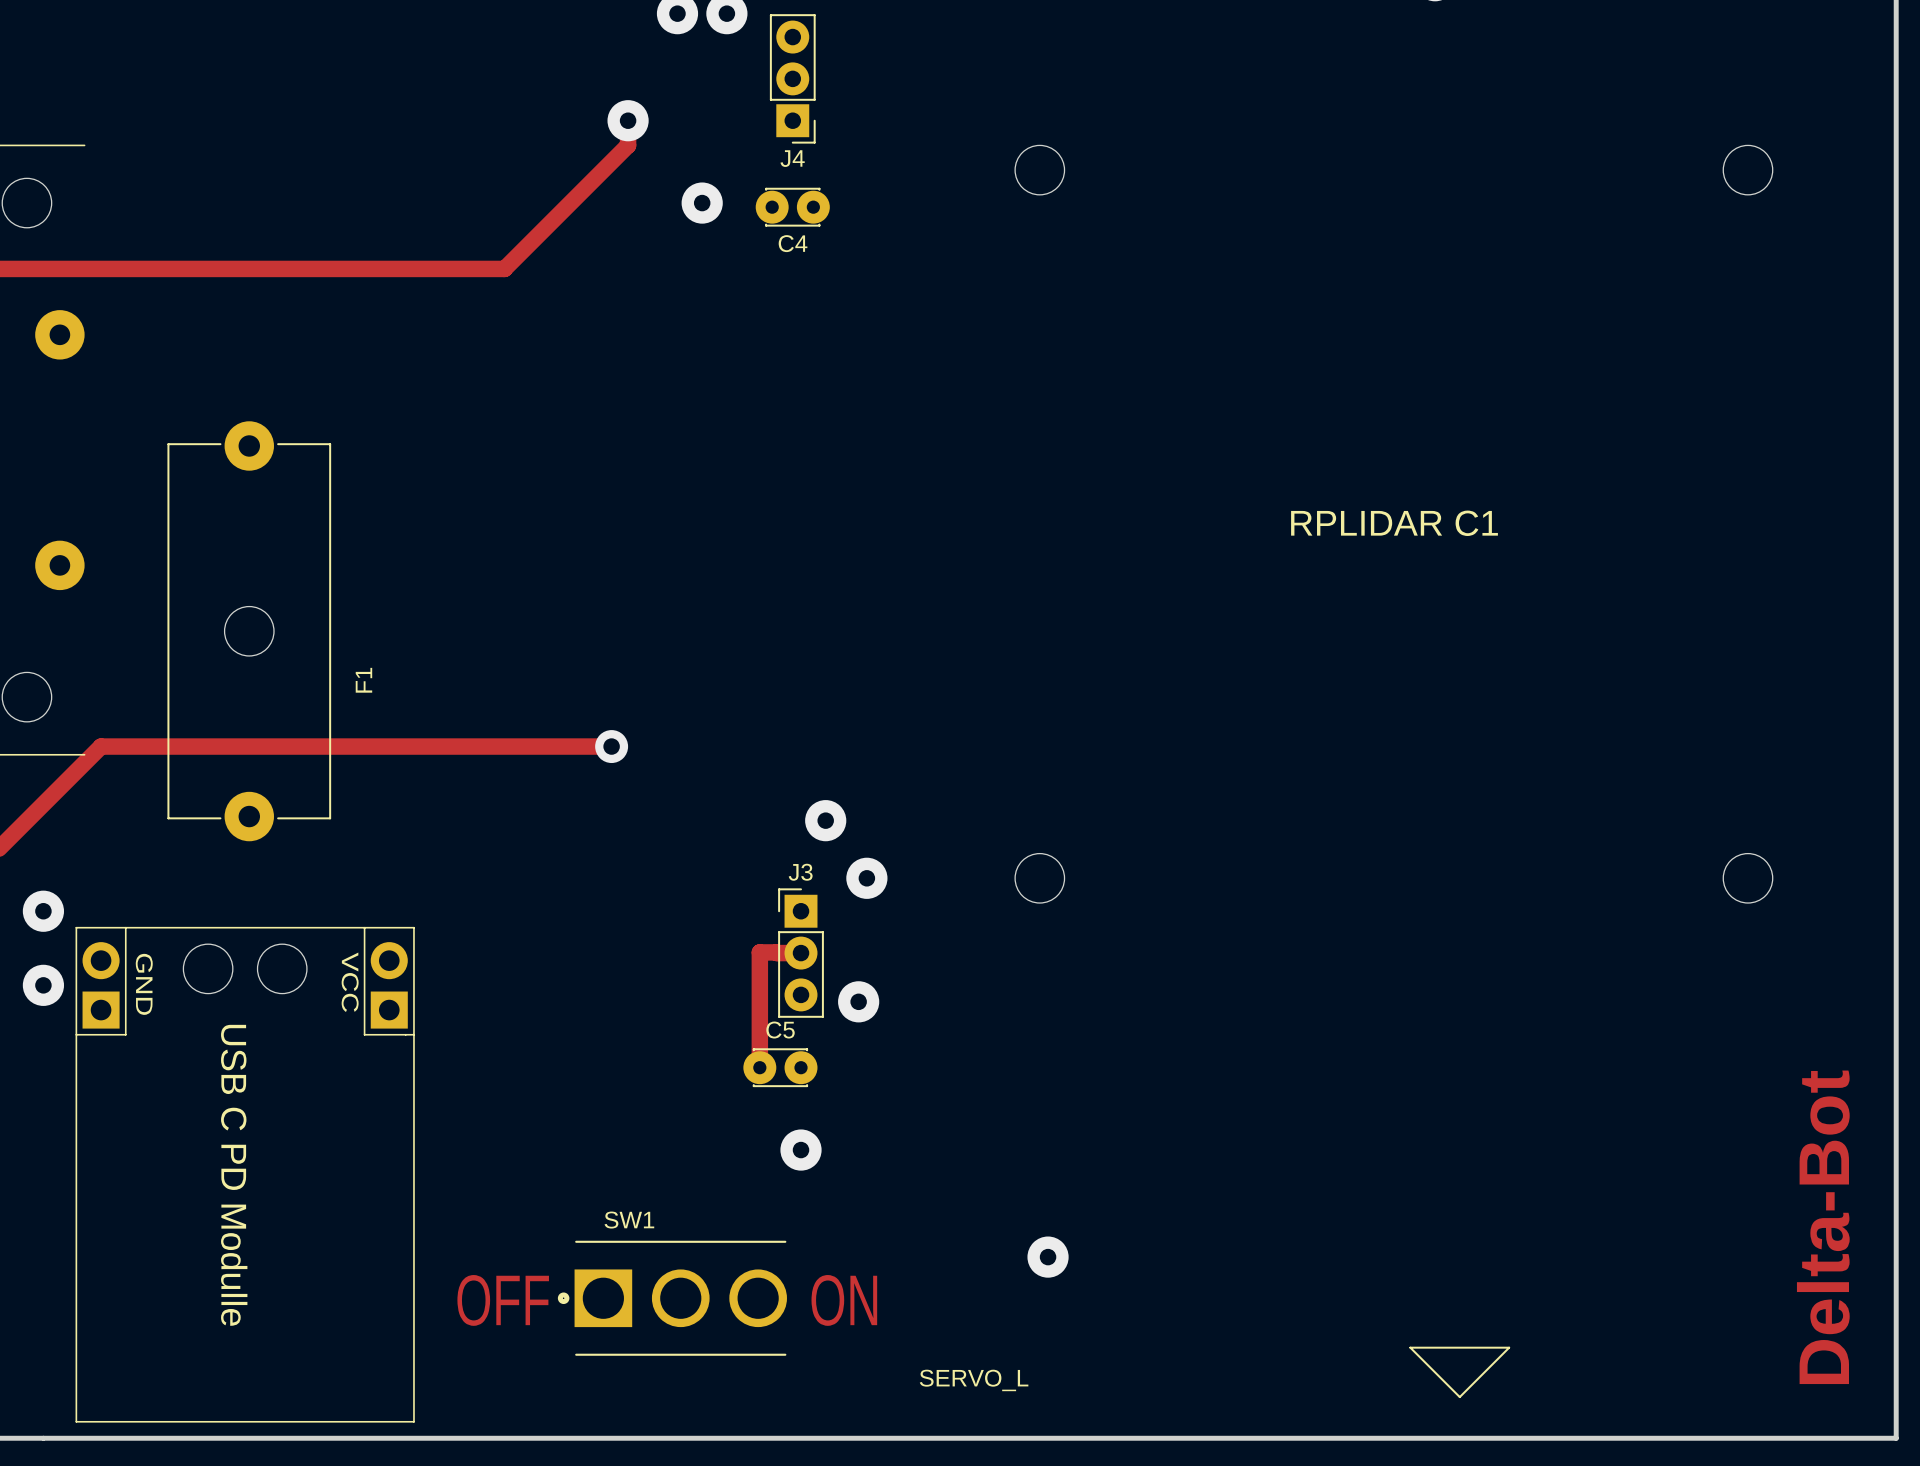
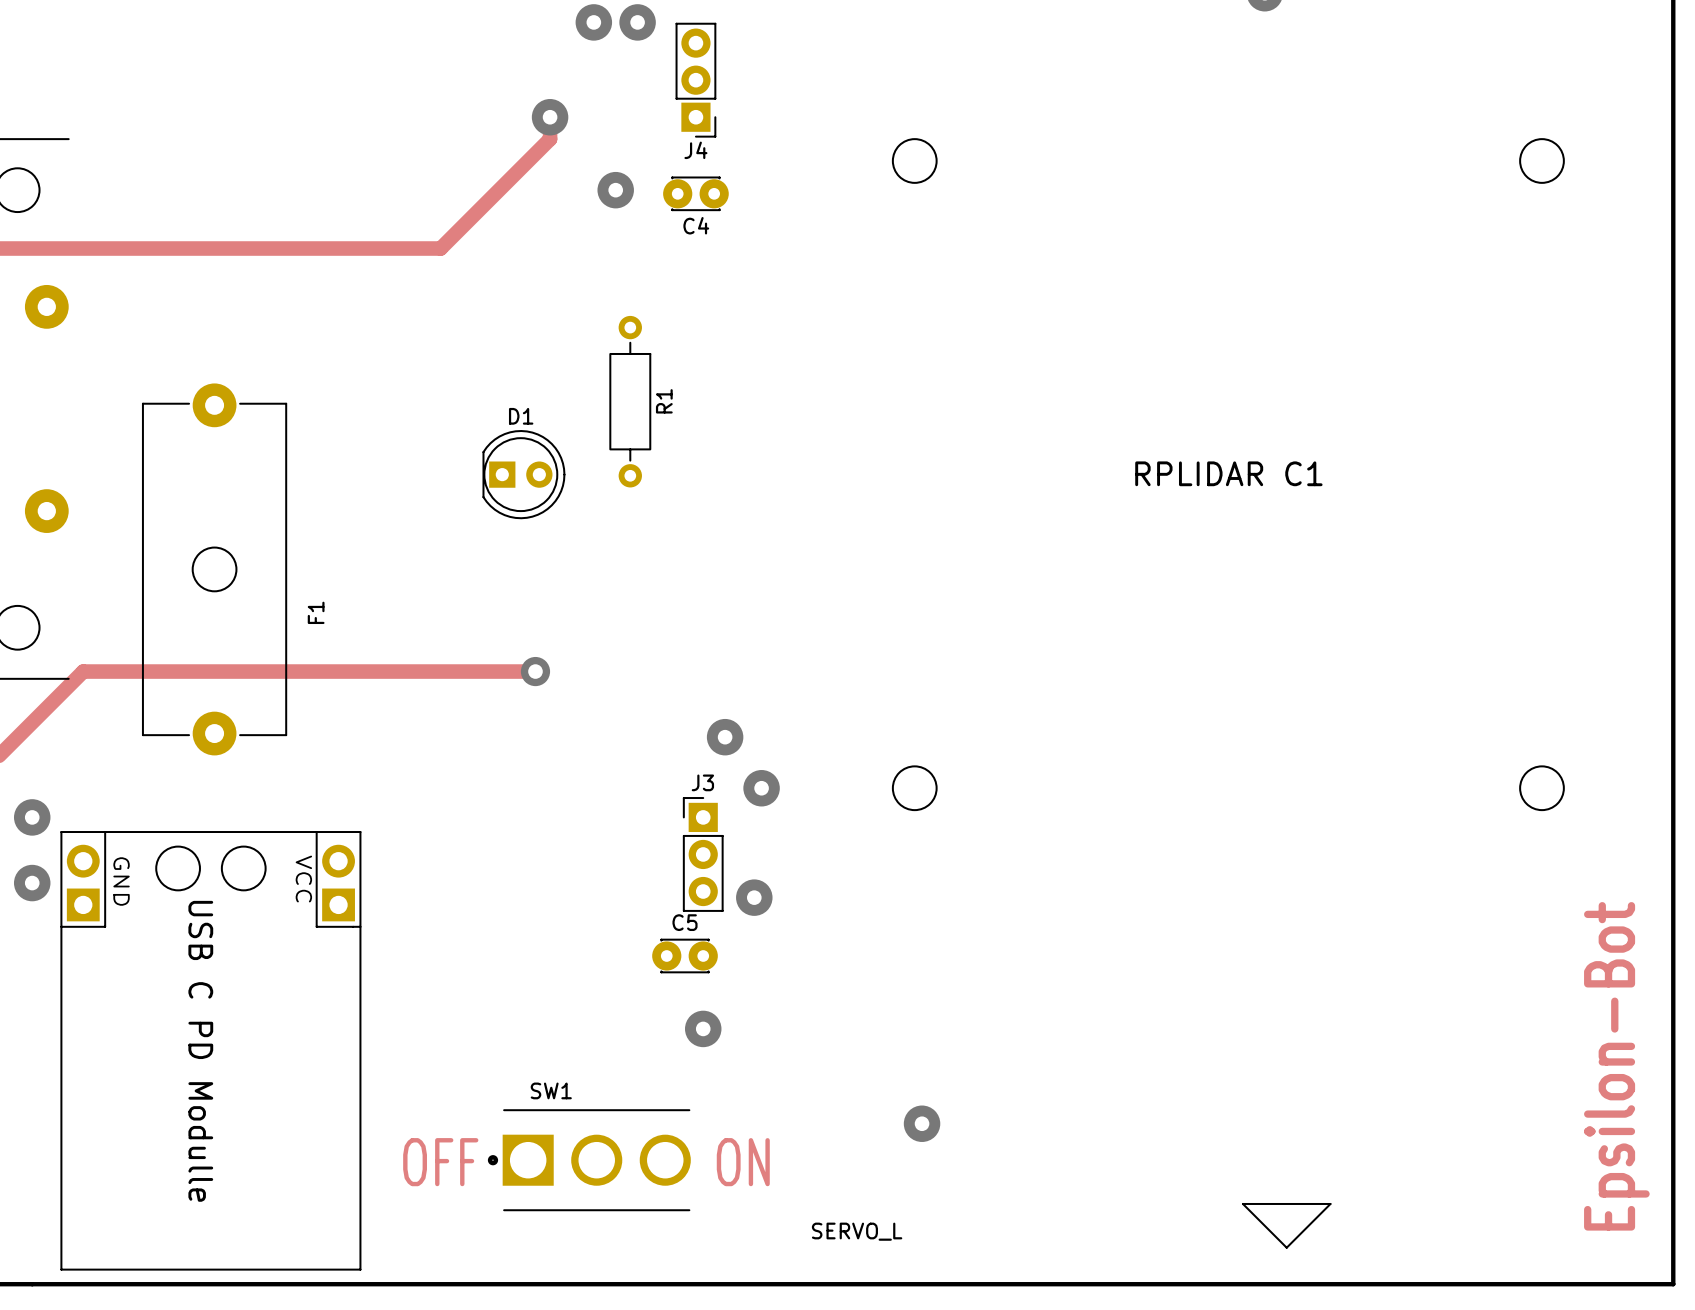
R1: none -> (630, 401)
D1: none -> (523, 474)
track: (801, 953) (759, 952) (759, 1067) -> none
text: Delta-Bot (1823, 1227) -> Epsilon-Bot (1616, 1066)

